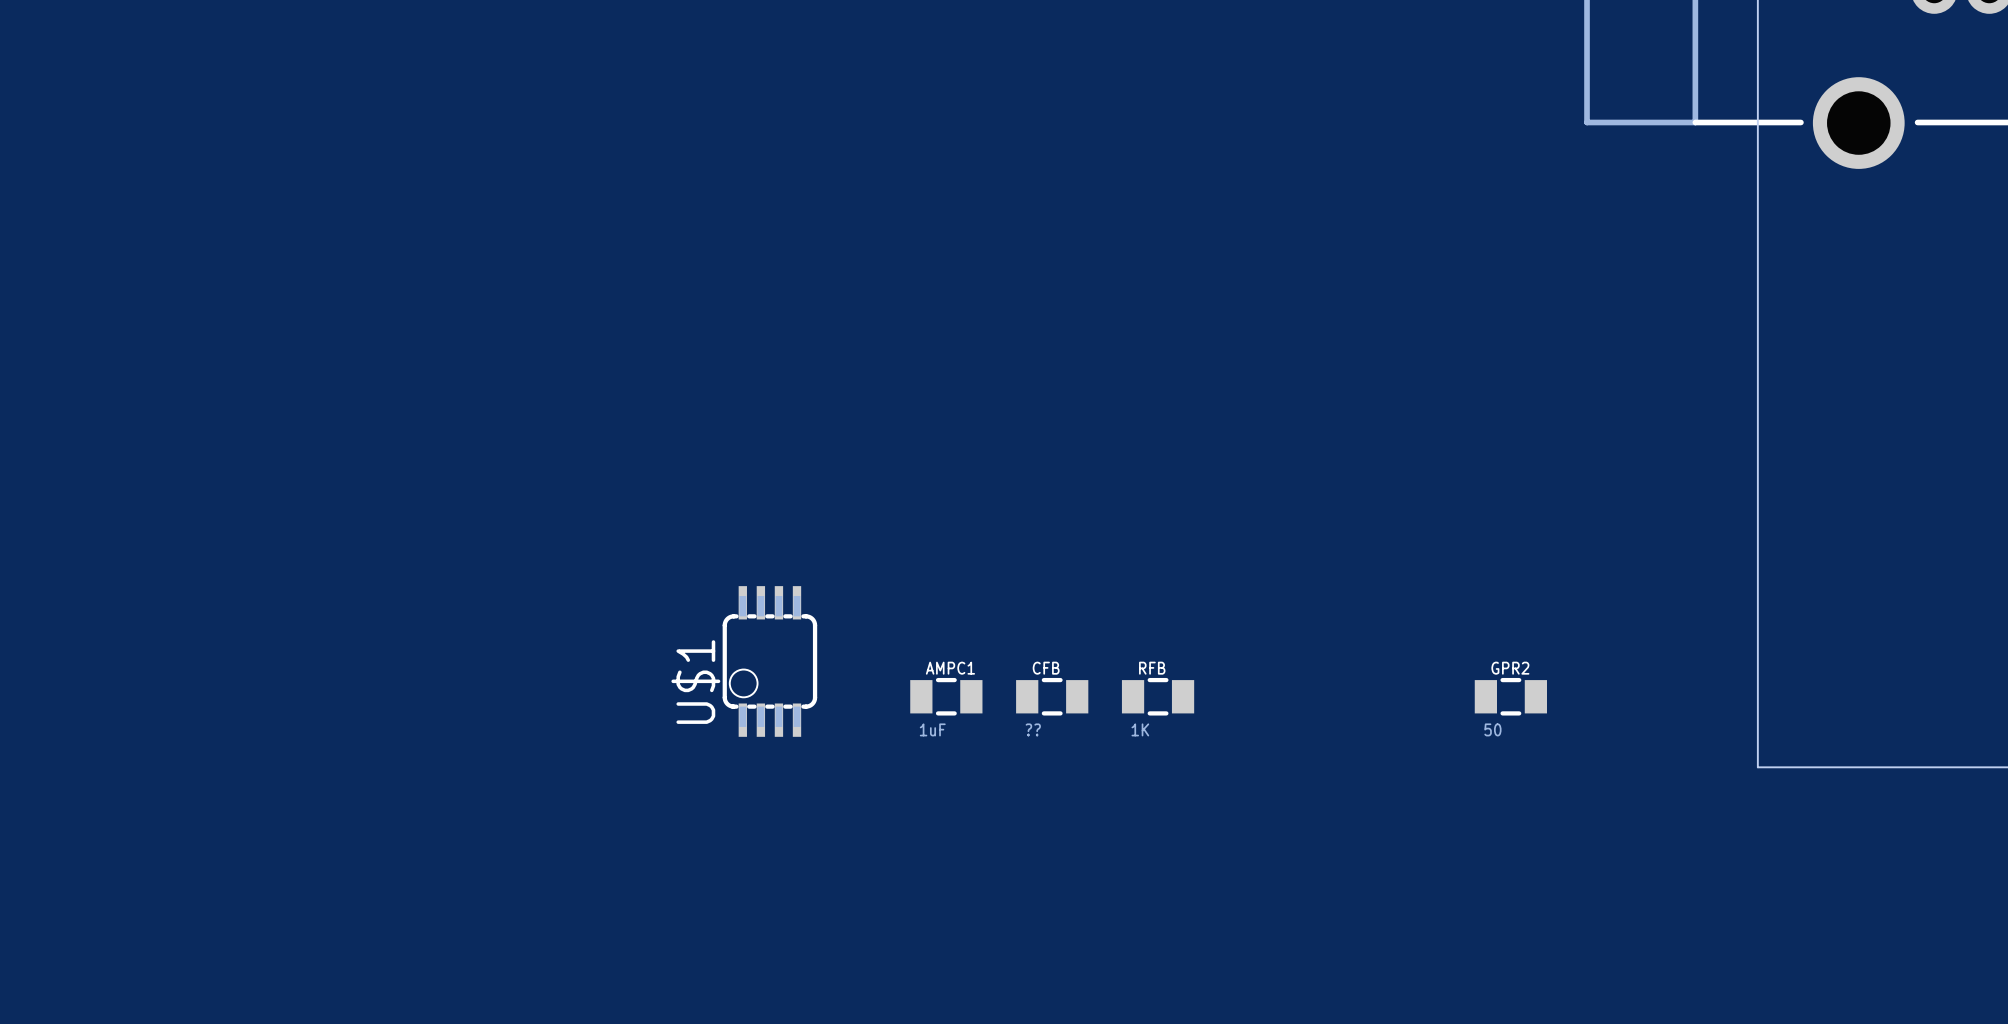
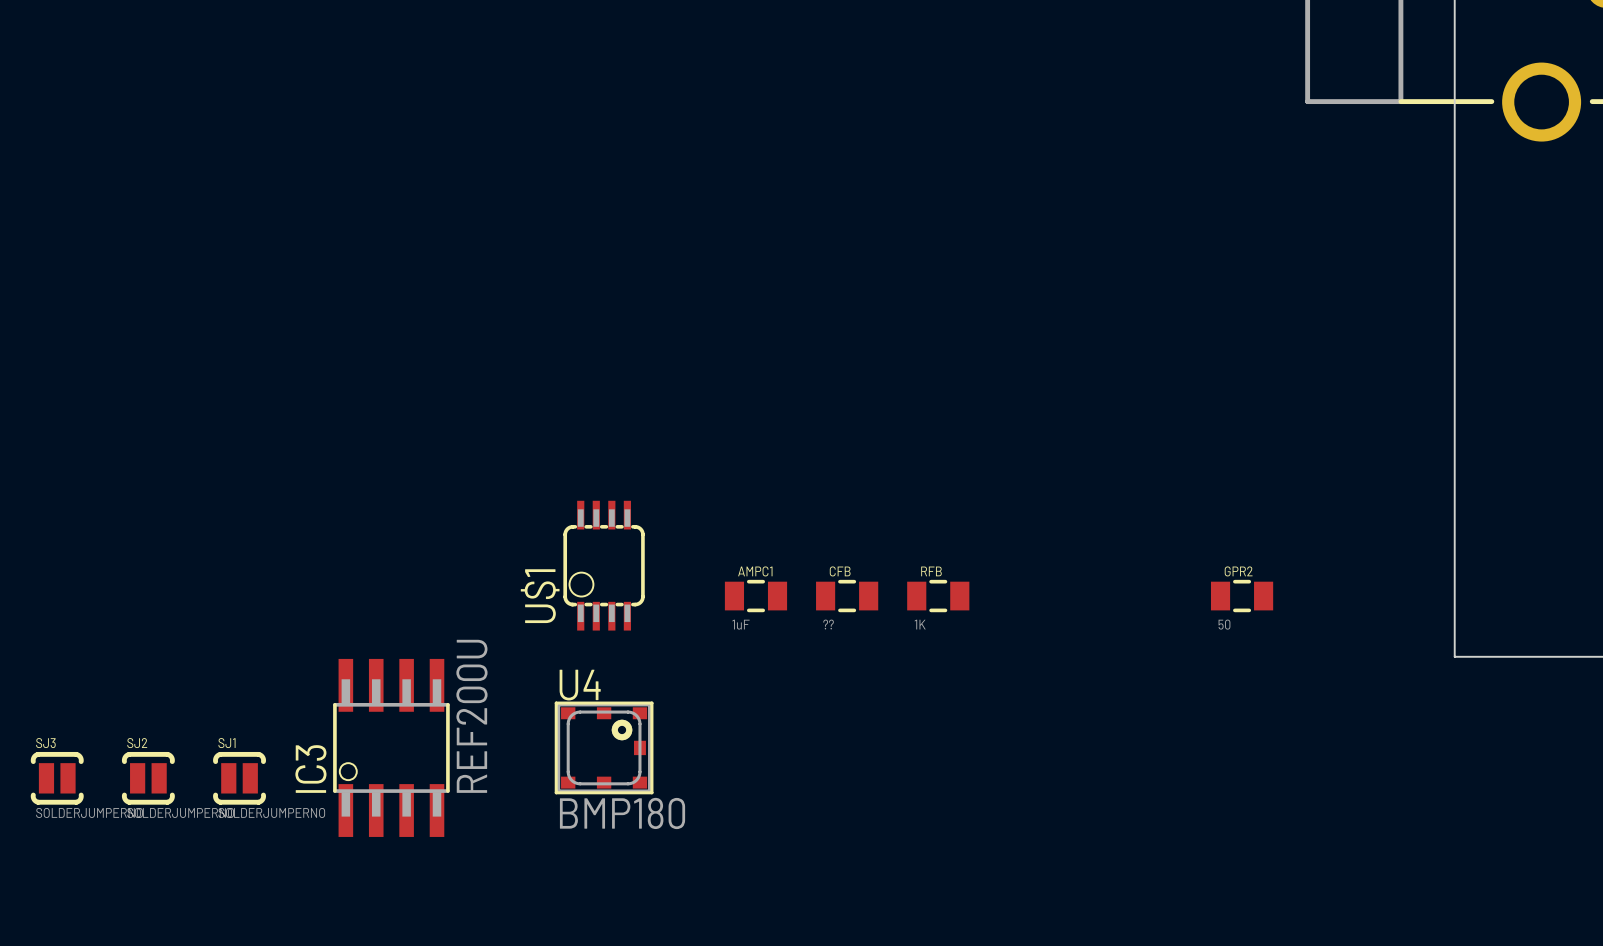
IC3: none -> REF200U (391, 747)
U4: none -> BMP180 (604, 747)
SJ3: none -> SOLDERJUMPERNO (57, 778)
SJ2: none -> SOLDERJUMPERNO (148, 778)
SJ1: none -> SOLDERJUMPERNO (239, 778)

